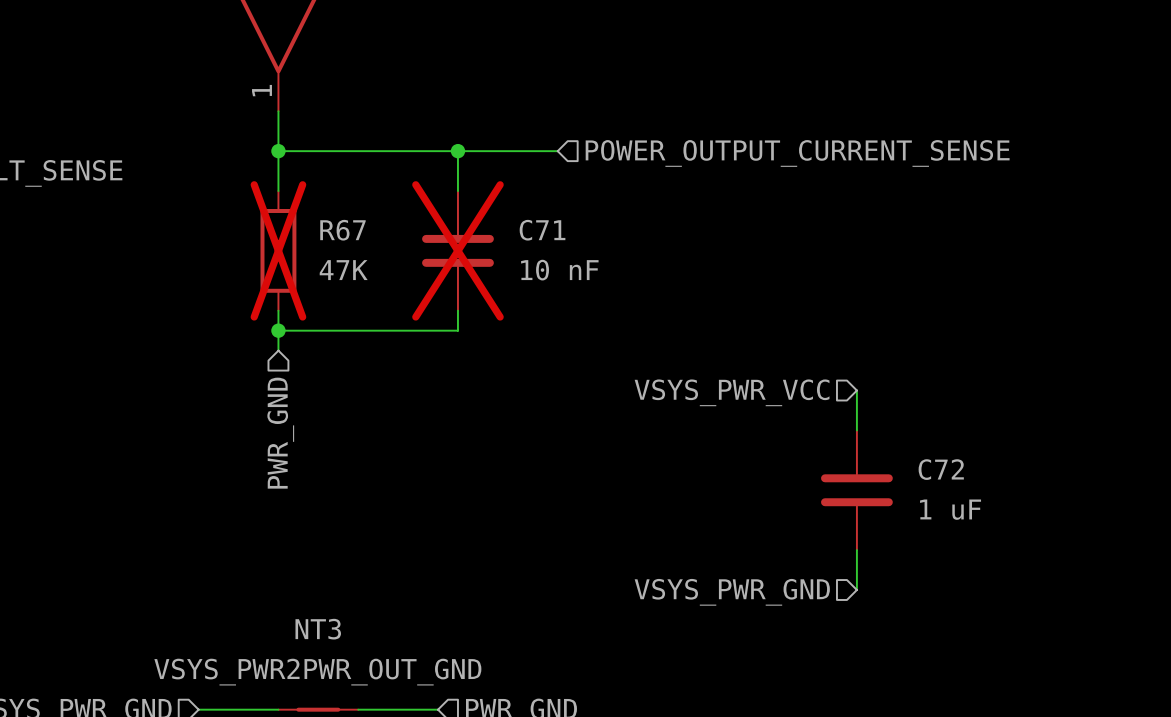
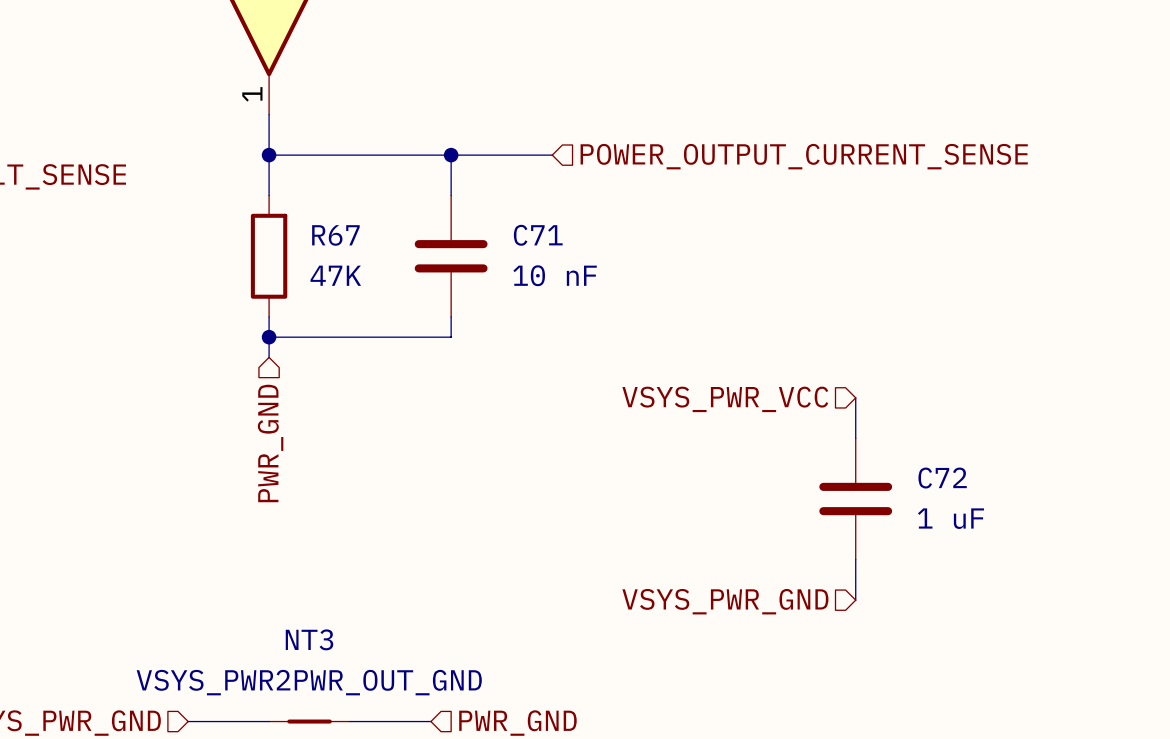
R67 do-not-place cross: (278, 250) -> none
C71 do-not-place cross: (457, 250) -> none

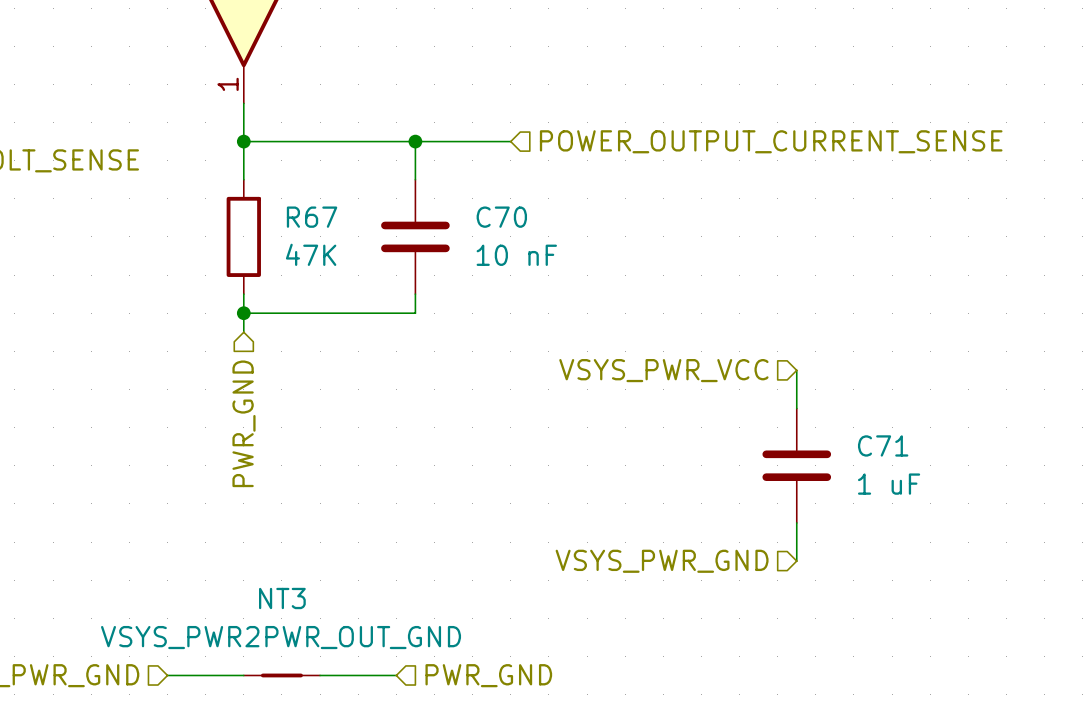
C71 name: C71 (538, 235) -> C70 (501, 217)
C72 name: C72 (942, 478) -> C71 (883, 445)

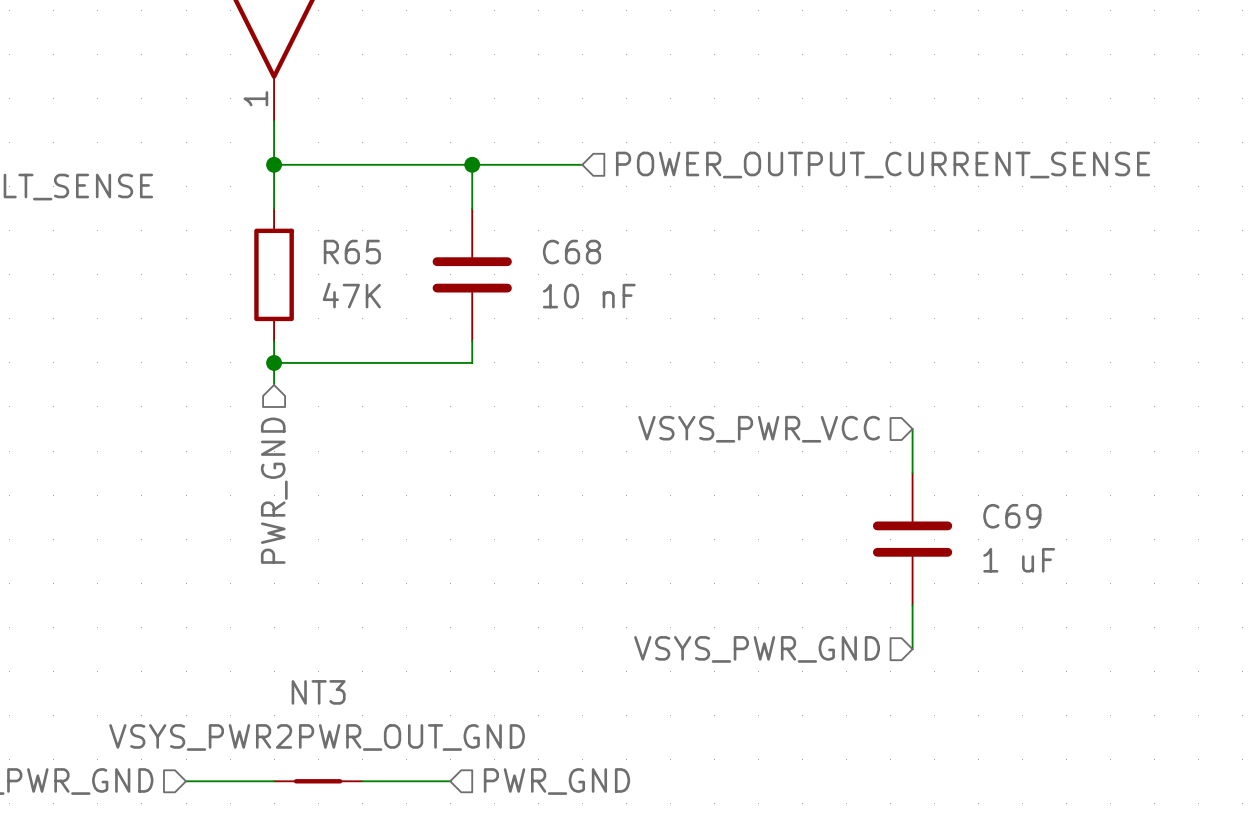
R67 name: R67 (312, 217) -> R65 (352, 252)
C70 name: C70 (501, 217) -> C68 (571, 252)
C71 name: C71 (883, 445) -> C69 (1012, 516)

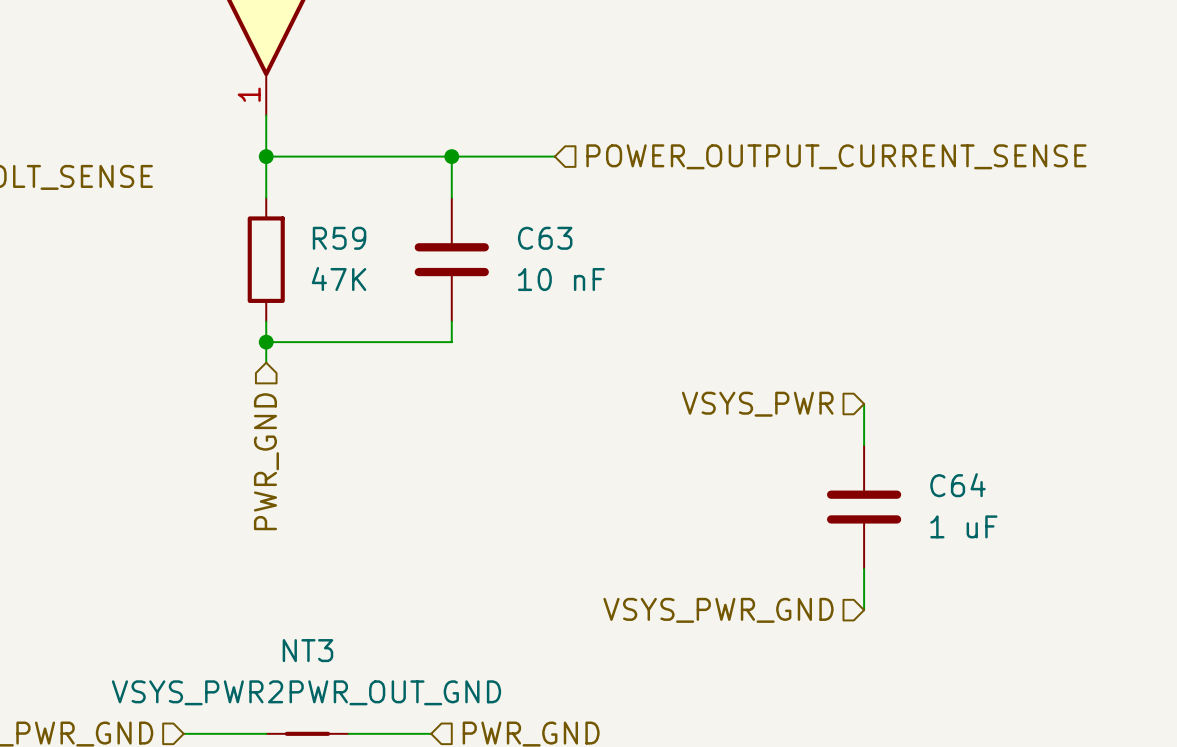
R65 name: R65 (352, 252) -> R59 (339, 238)
C68 name: C68 (571, 252) -> C63 (545, 238)
hierarchical label: VSYS_PWR_VCC (759, 429) -> VSYS_PWR (757, 404)
C69 name: C69 (1012, 516) -> C64 (958, 485)

